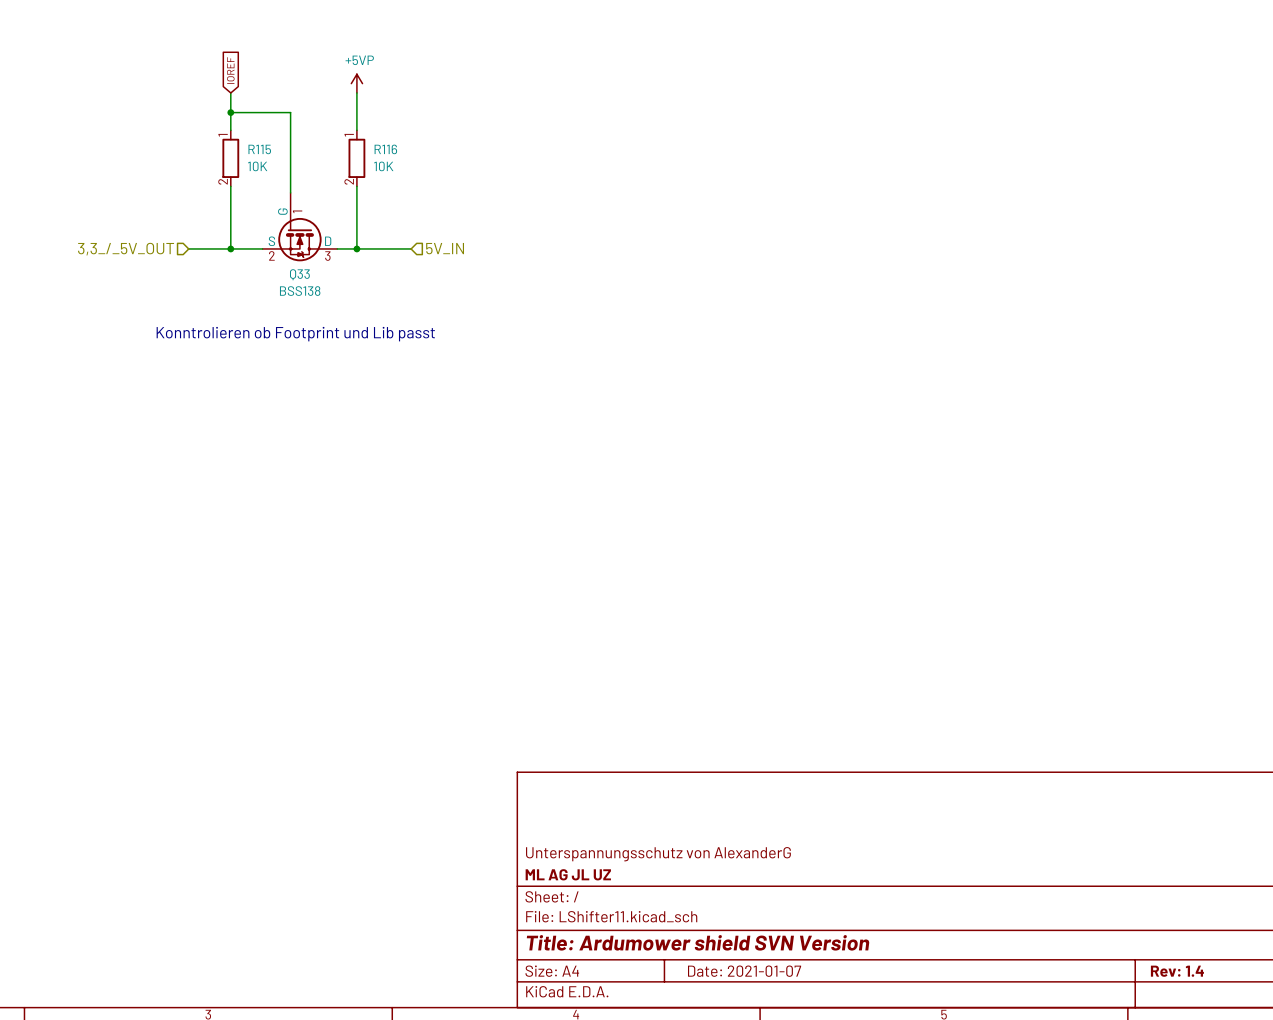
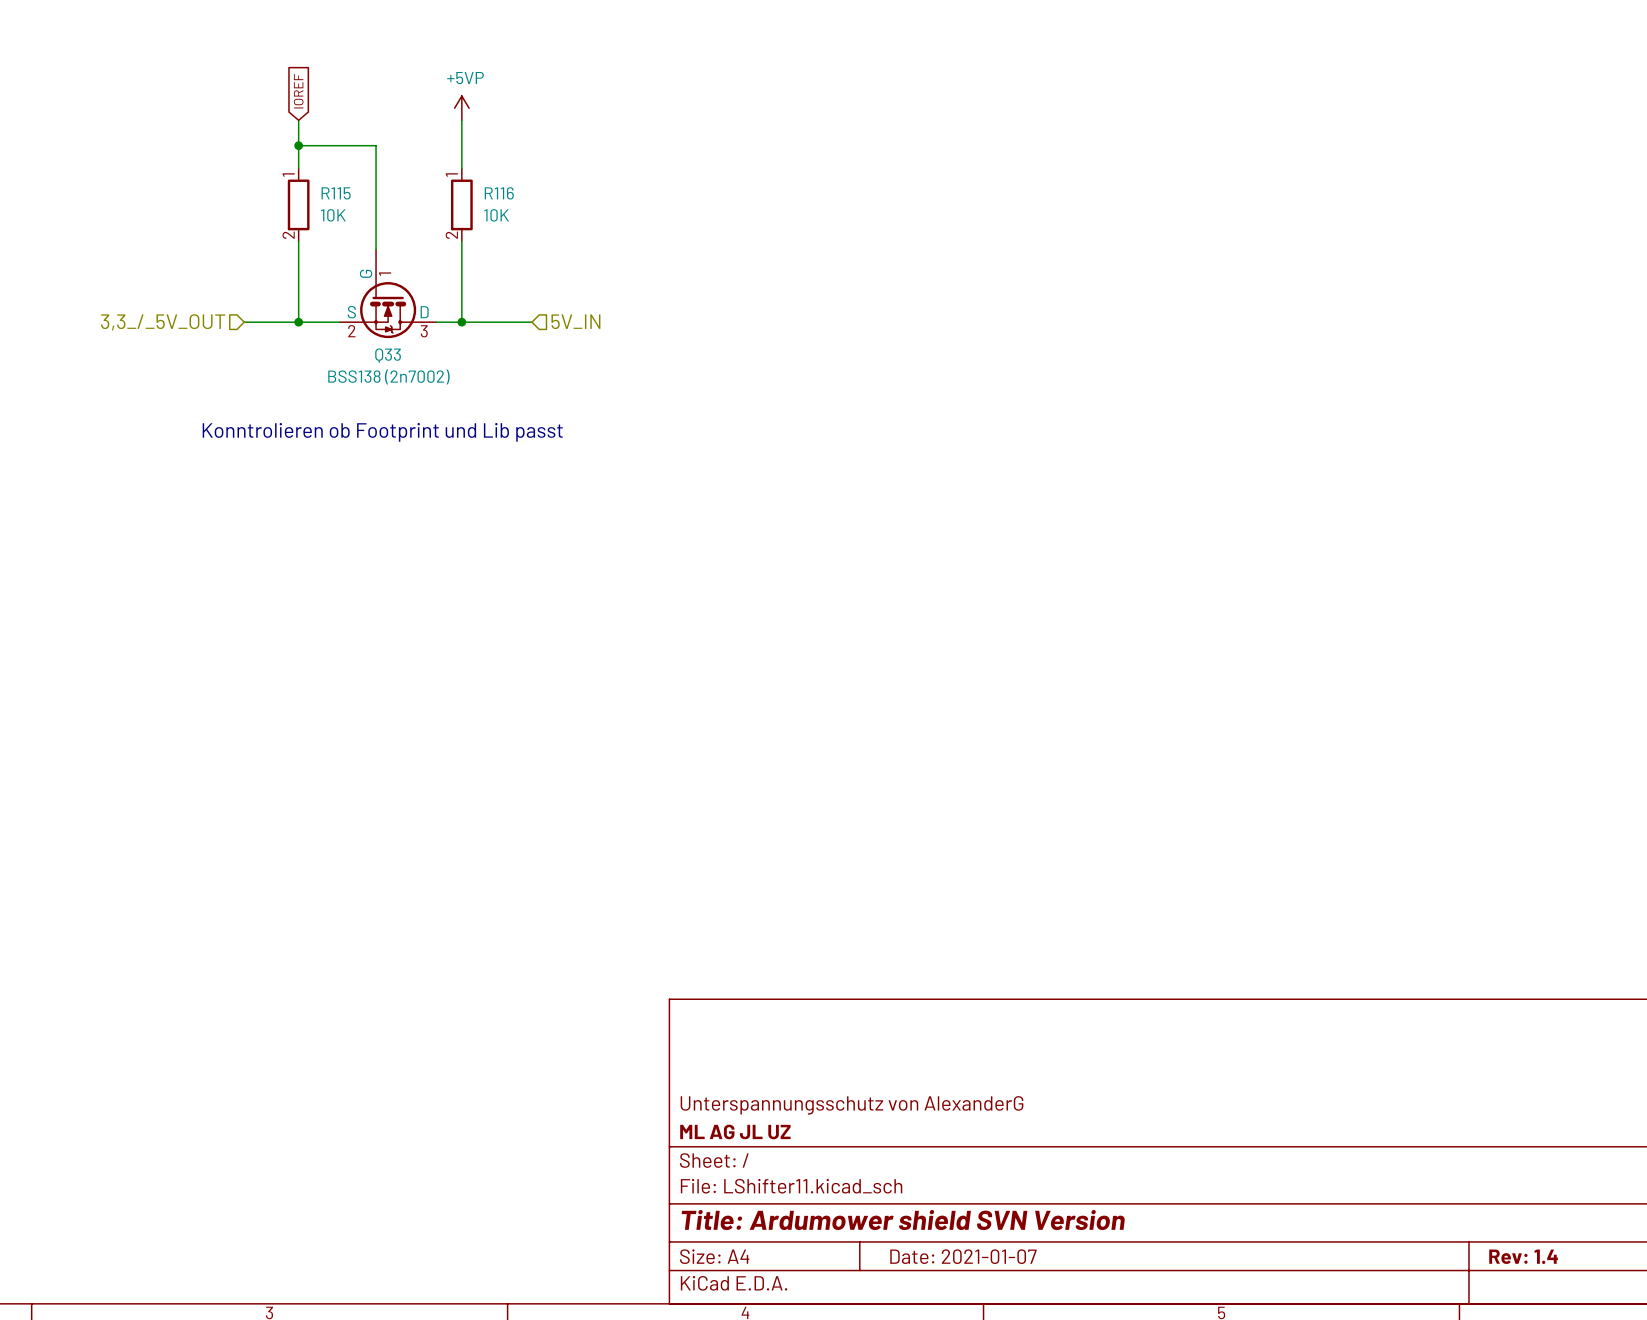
Q33 value: BSS138 (300, 291) -> BSS138 (2n7002) (388, 376)

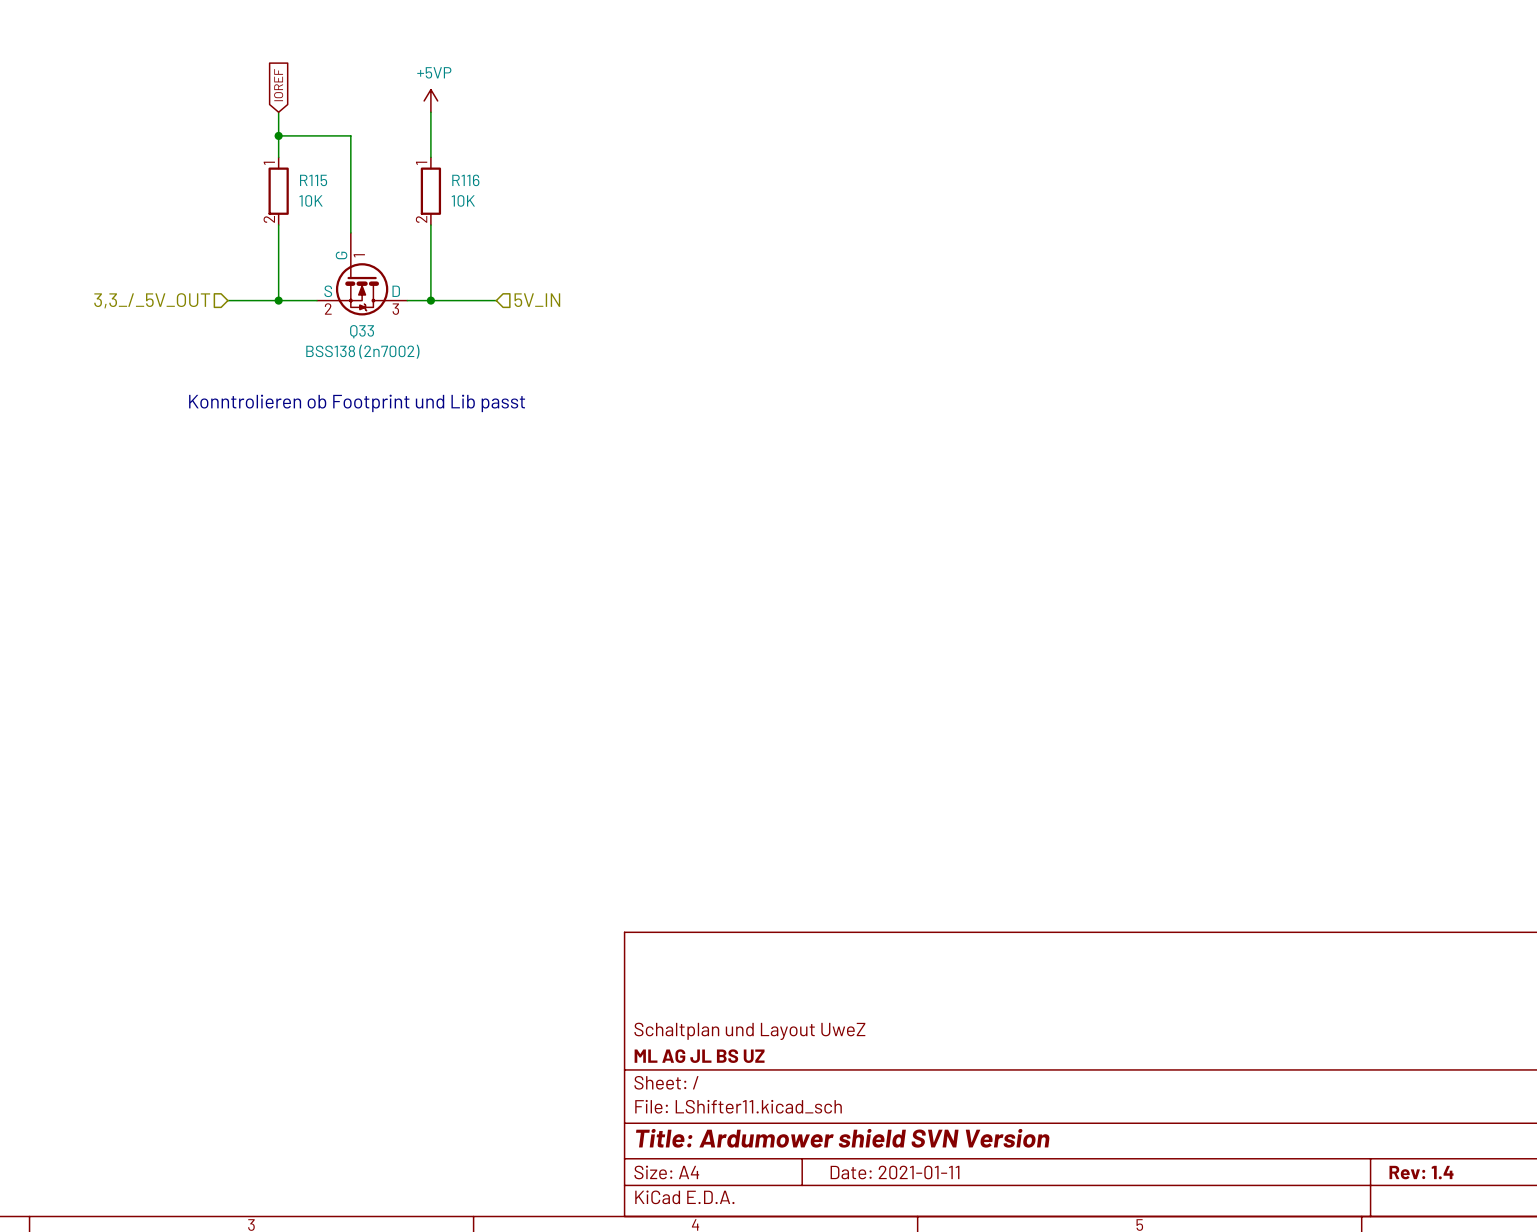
title block: Unterspannungsschutz von AlexanderG (852, 1105) -> Schaltplan und Layout UweZ (749, 1031)
title block: ML AG JL UZ (735, 1131) -> ML AG JL BS UZ (699, 1056)
title block: Date: 2021-01-07 (963, 1256) -> Date: 2021-01-11 (895, 1172)

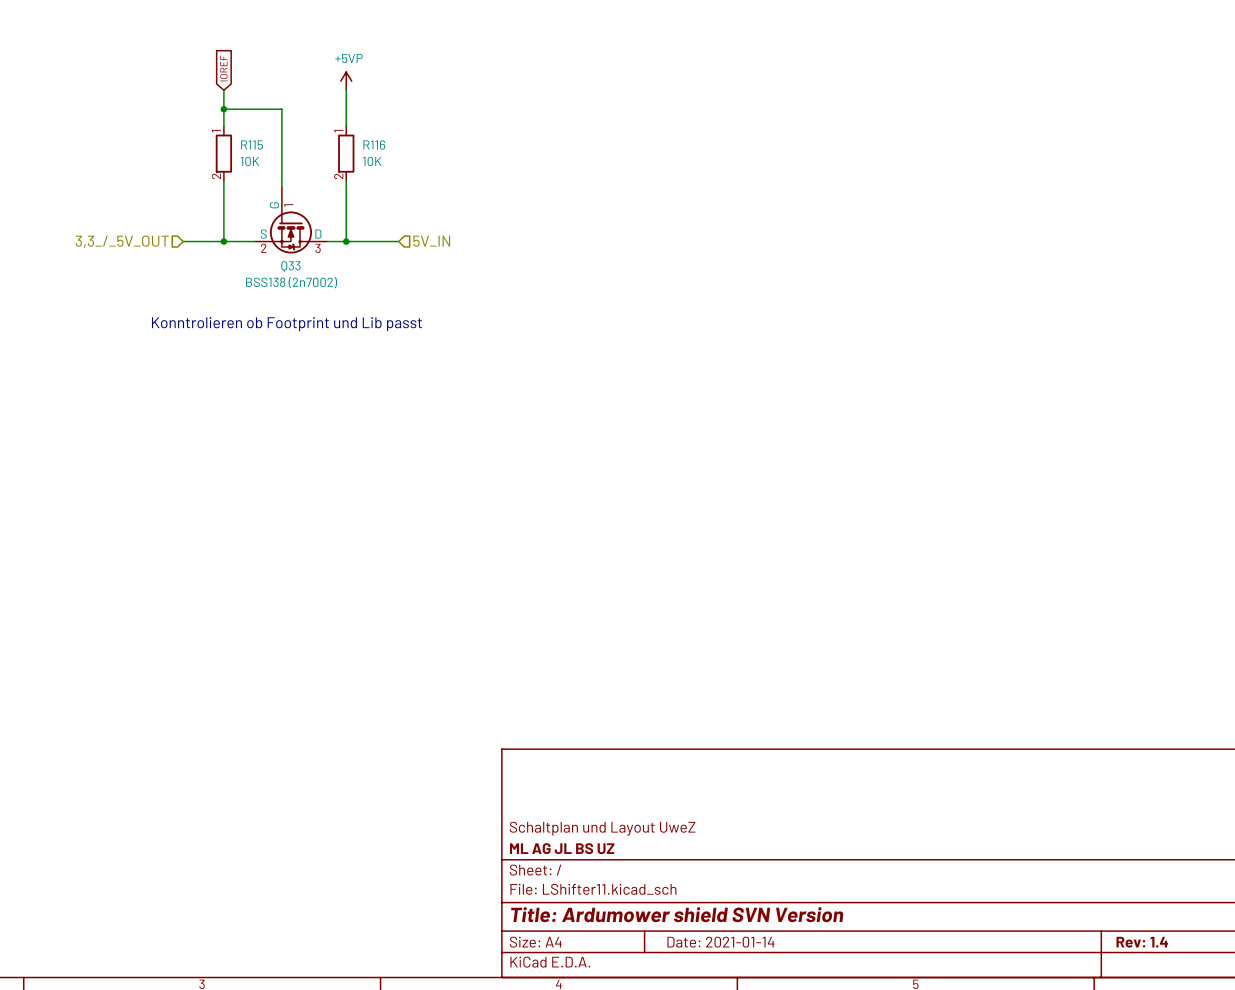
title block: Date: 2021-01-11 (895, 1172) -> Date: 2021-01-14 (720, 942)

